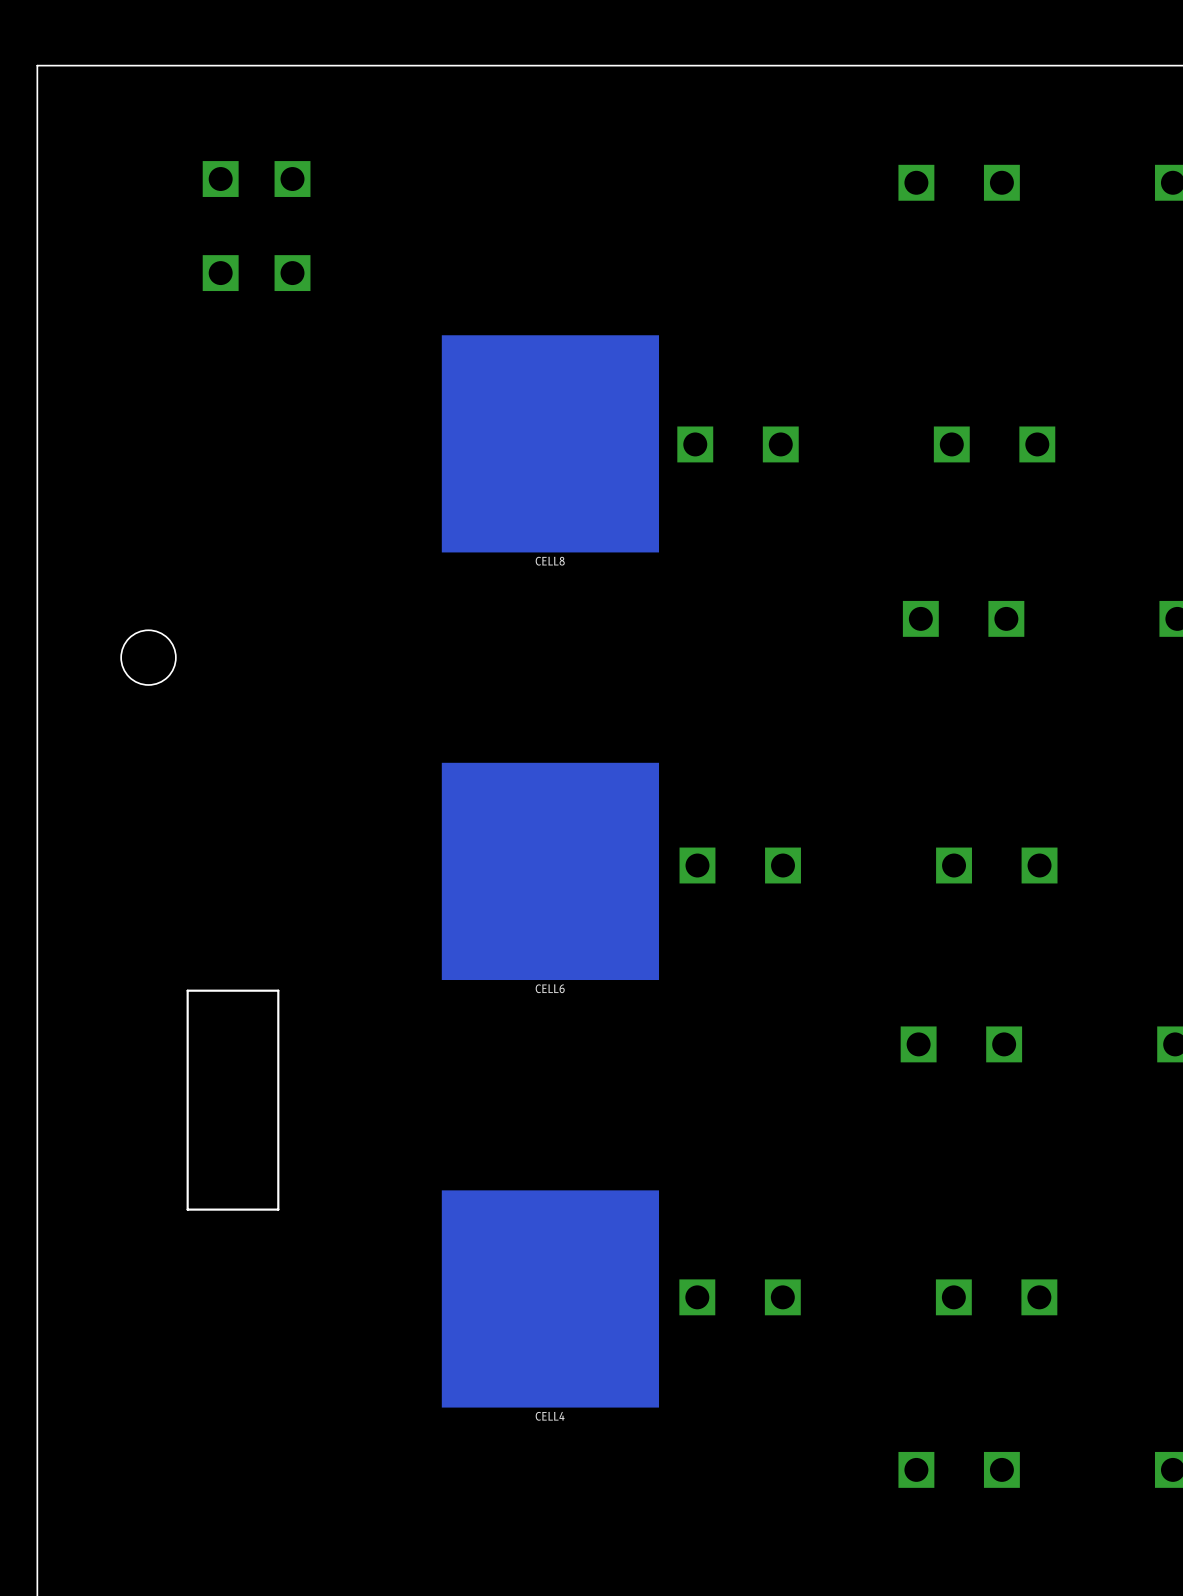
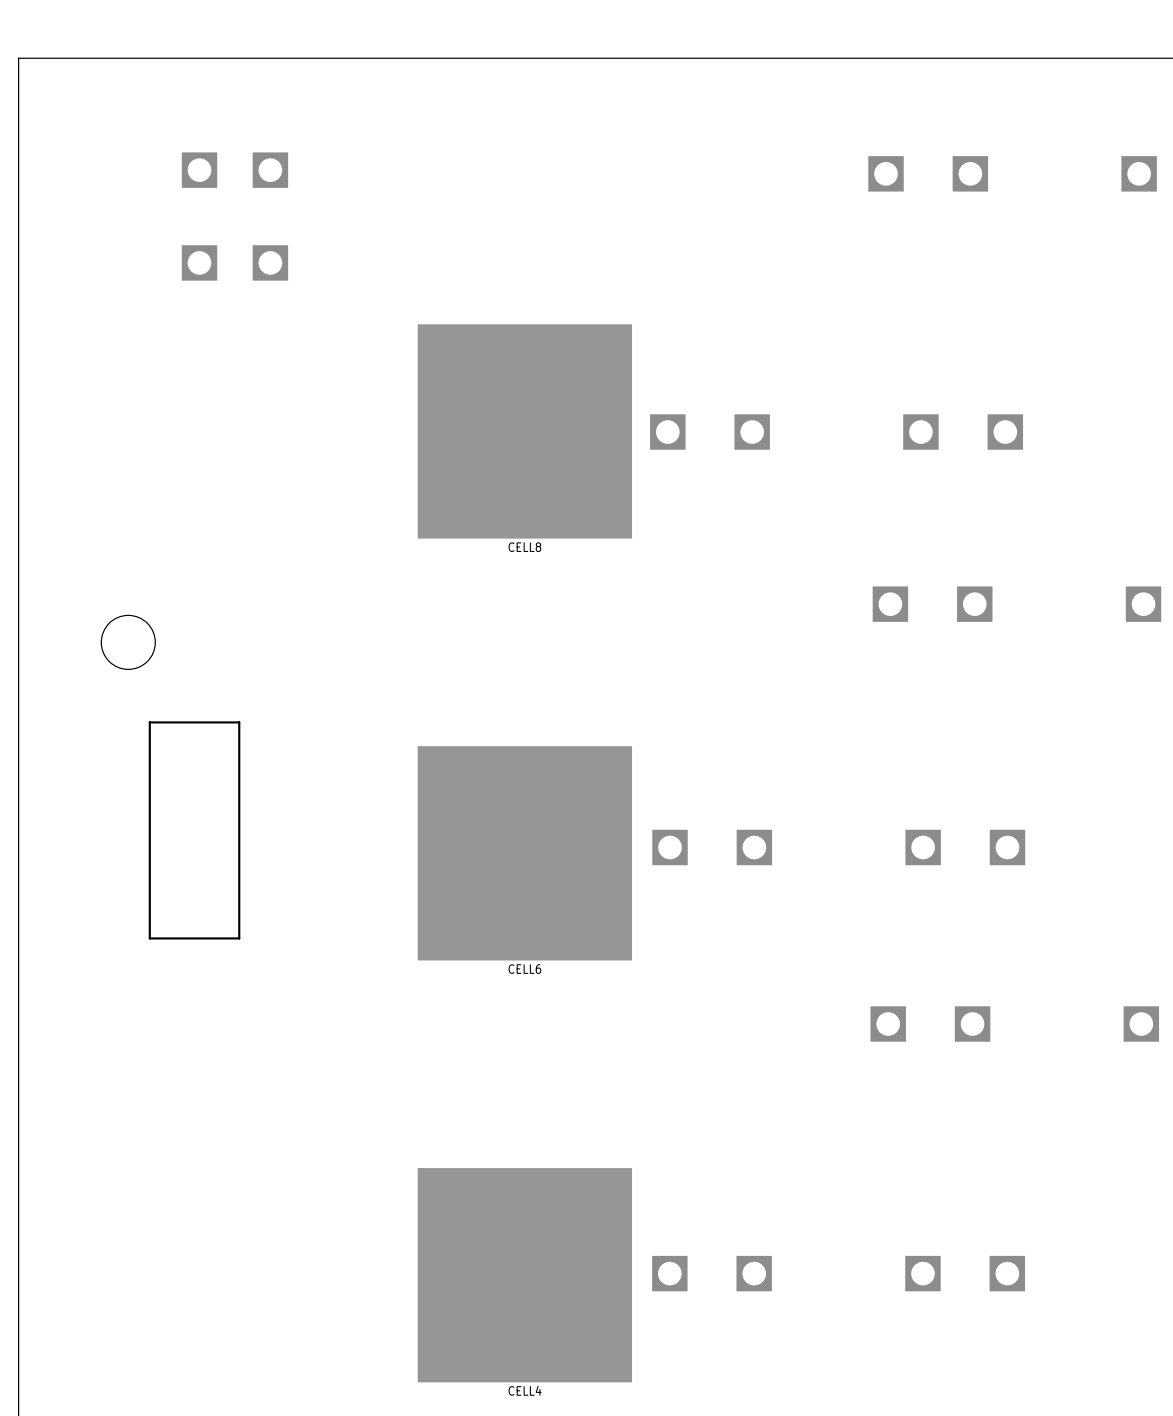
part position: (232, 1100) -> (194, 830)

